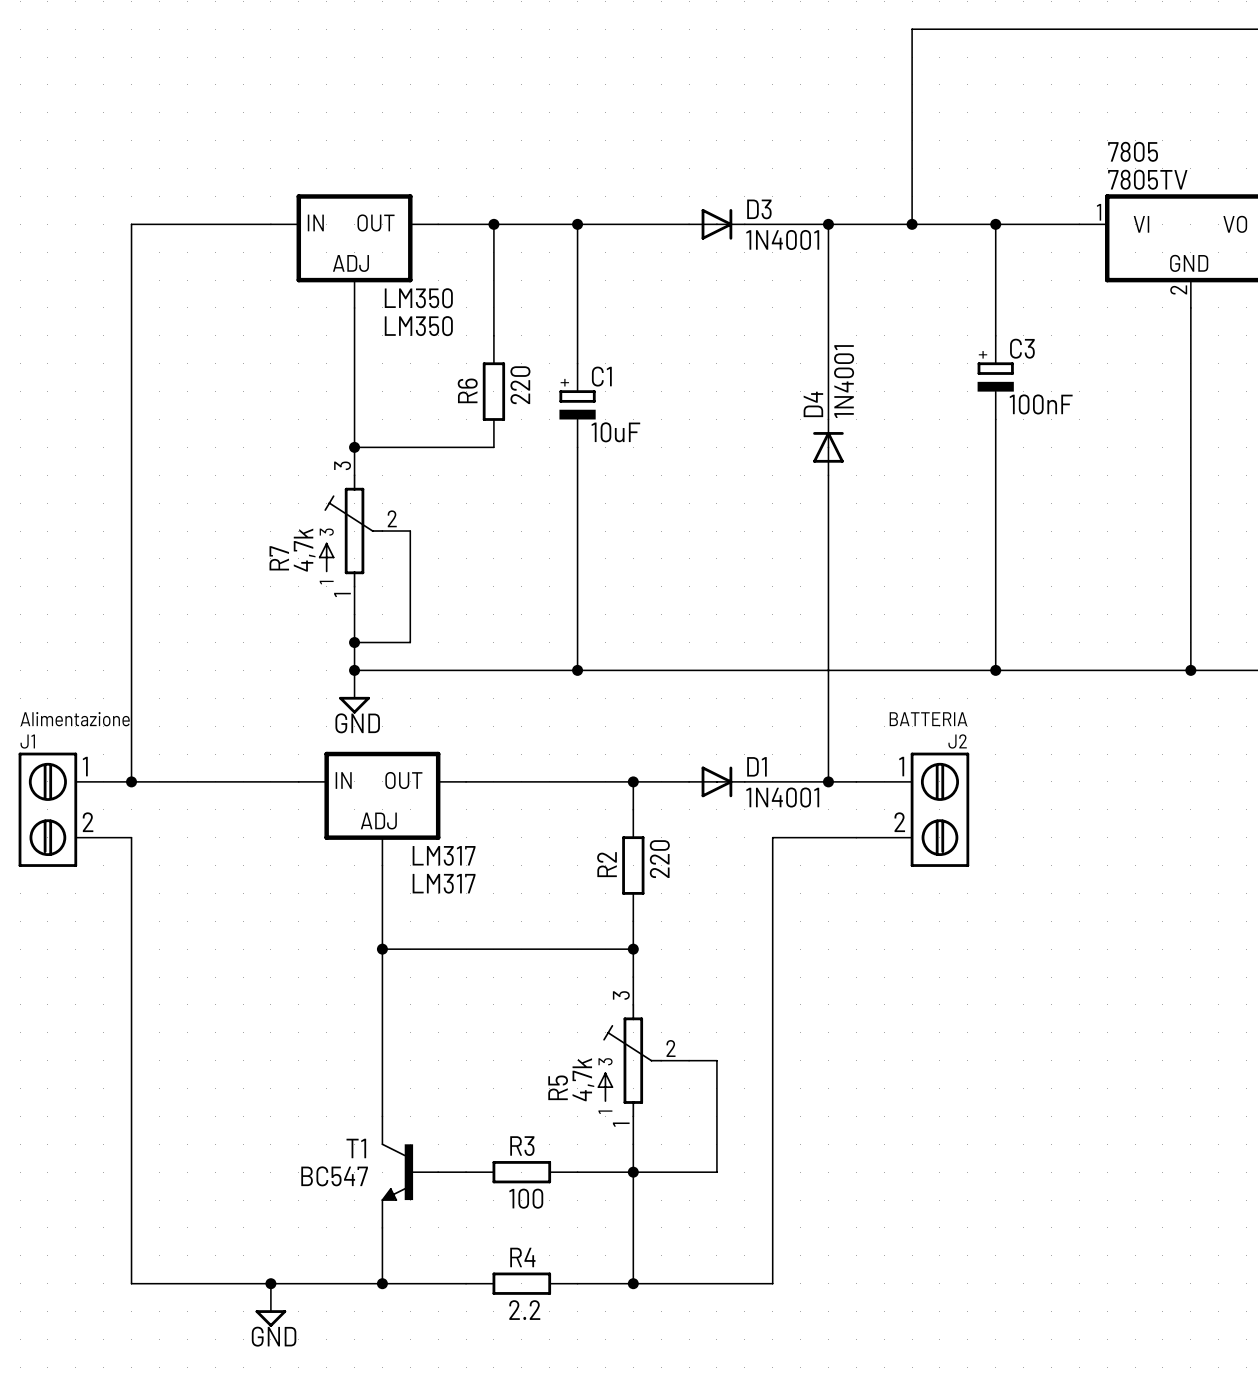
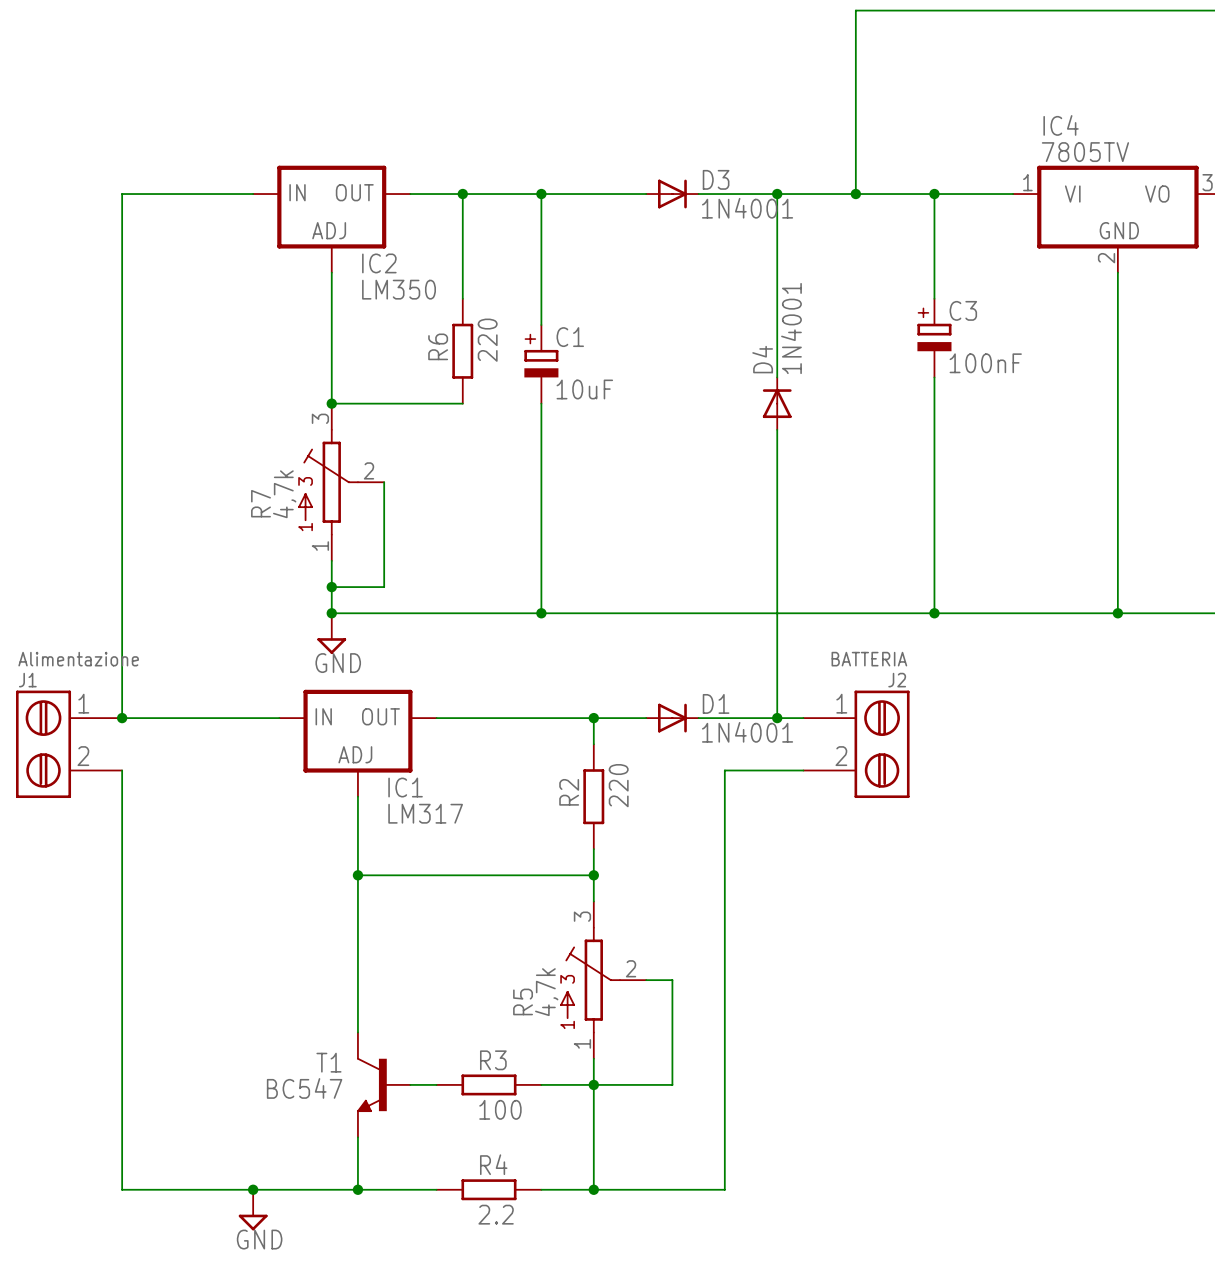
7805 name: 7805 (1133, 151) -> IC4 (1061, 125)
LM350 name: LM350 (418, 298) -> IC2 (379, 263)
LM317 name: LM317 (444, 855) -> IC1 (405, 787)

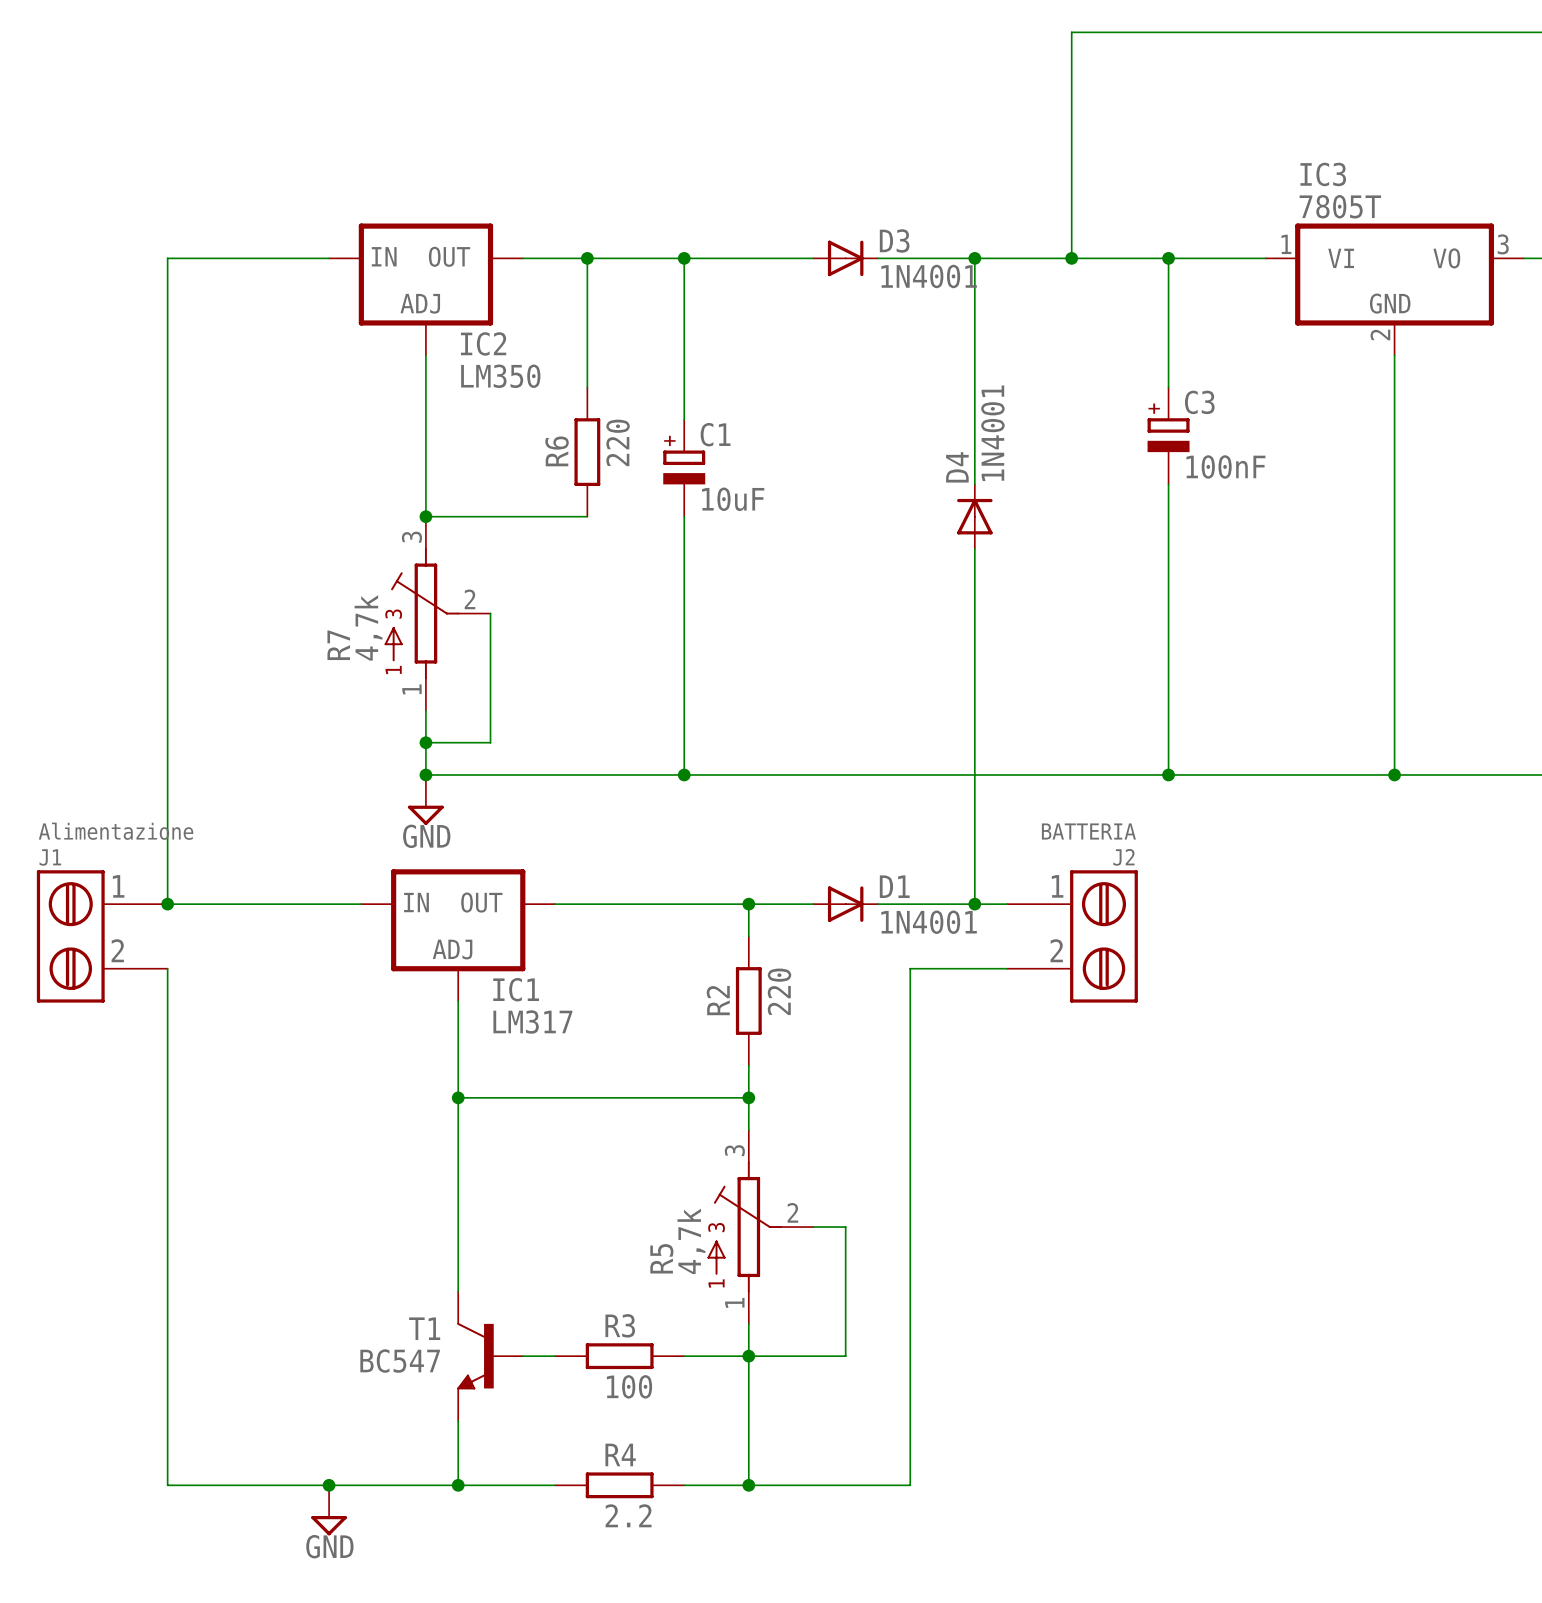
IC4 name: IC4 (1061, 125) -> IC3 (1323, 174)
IC4 value: 7805TV (1085, 152) -> 7805T (1340, 206)

